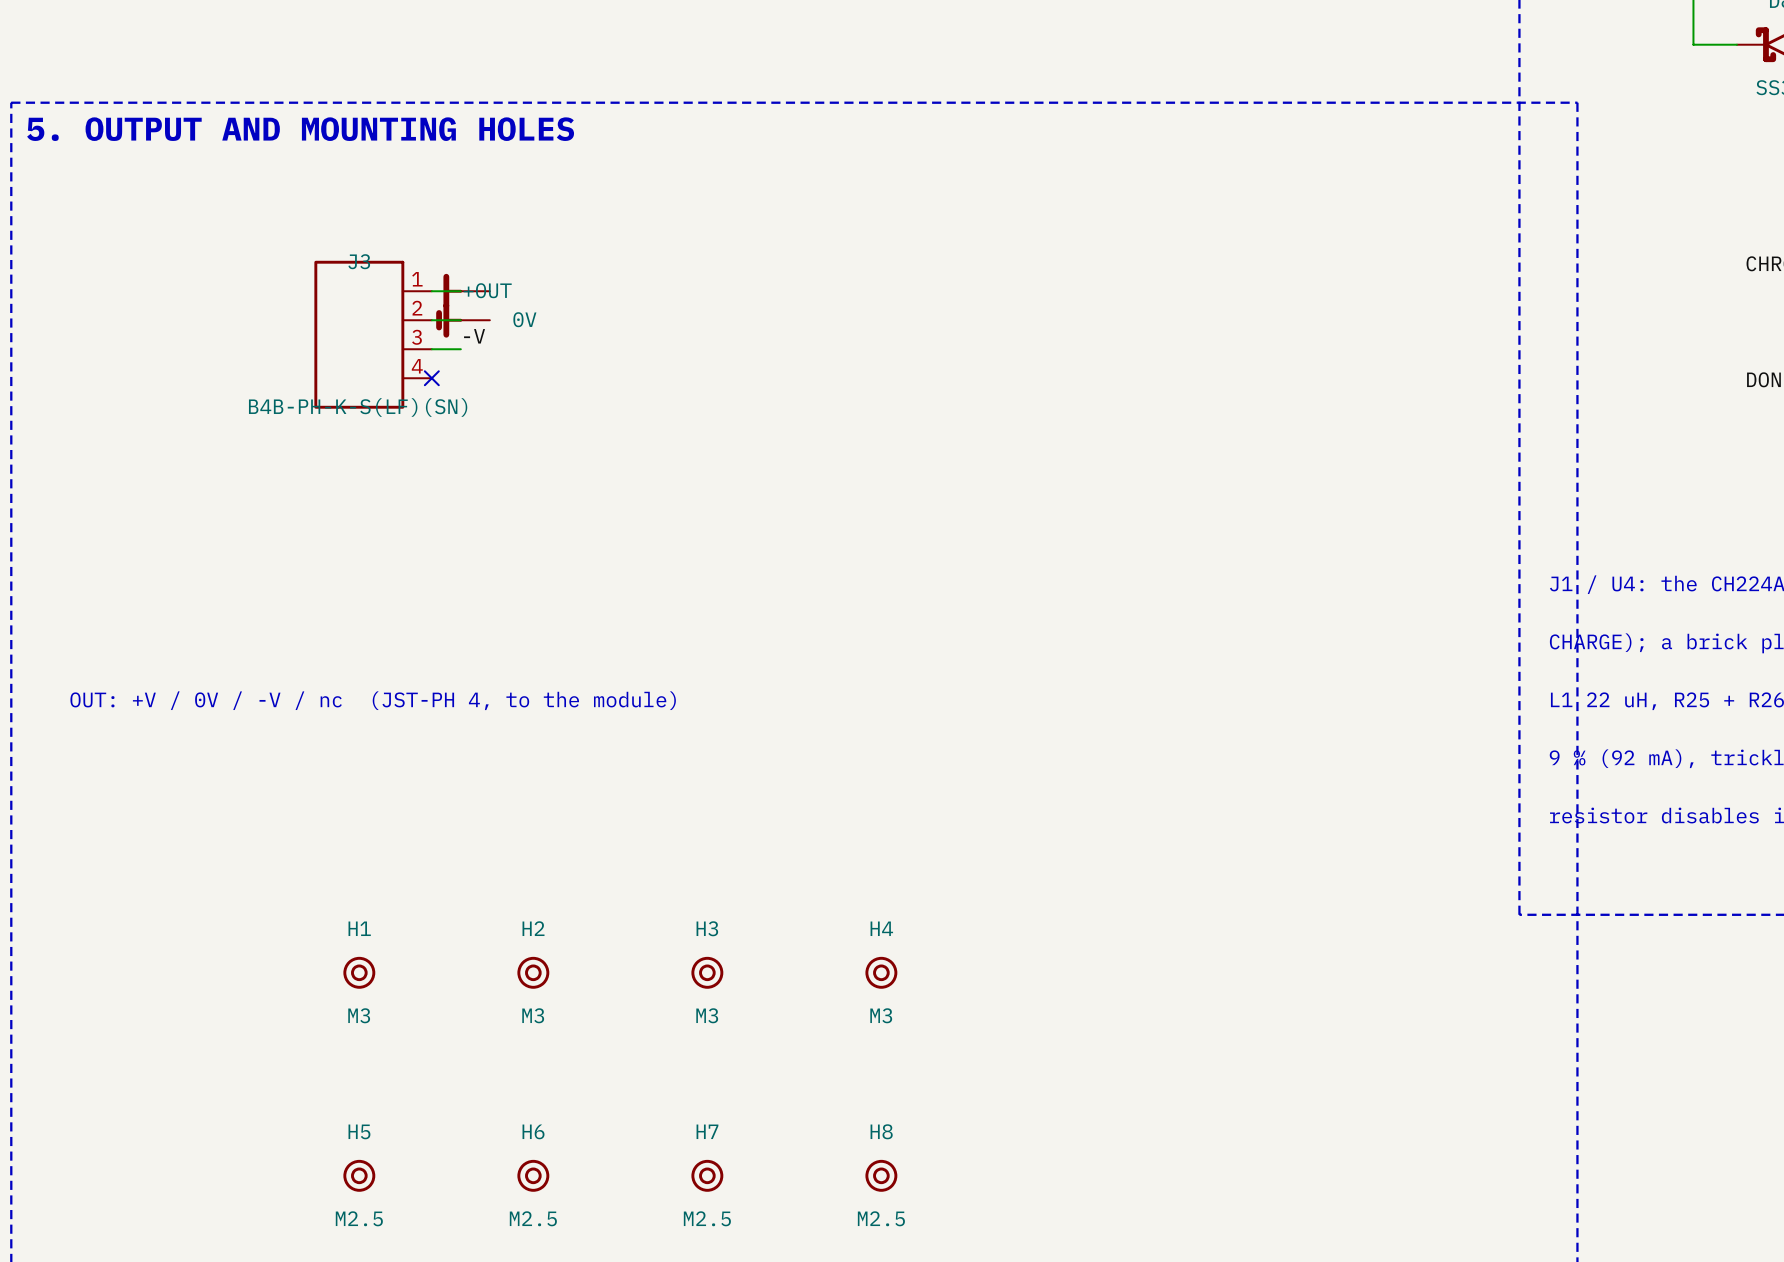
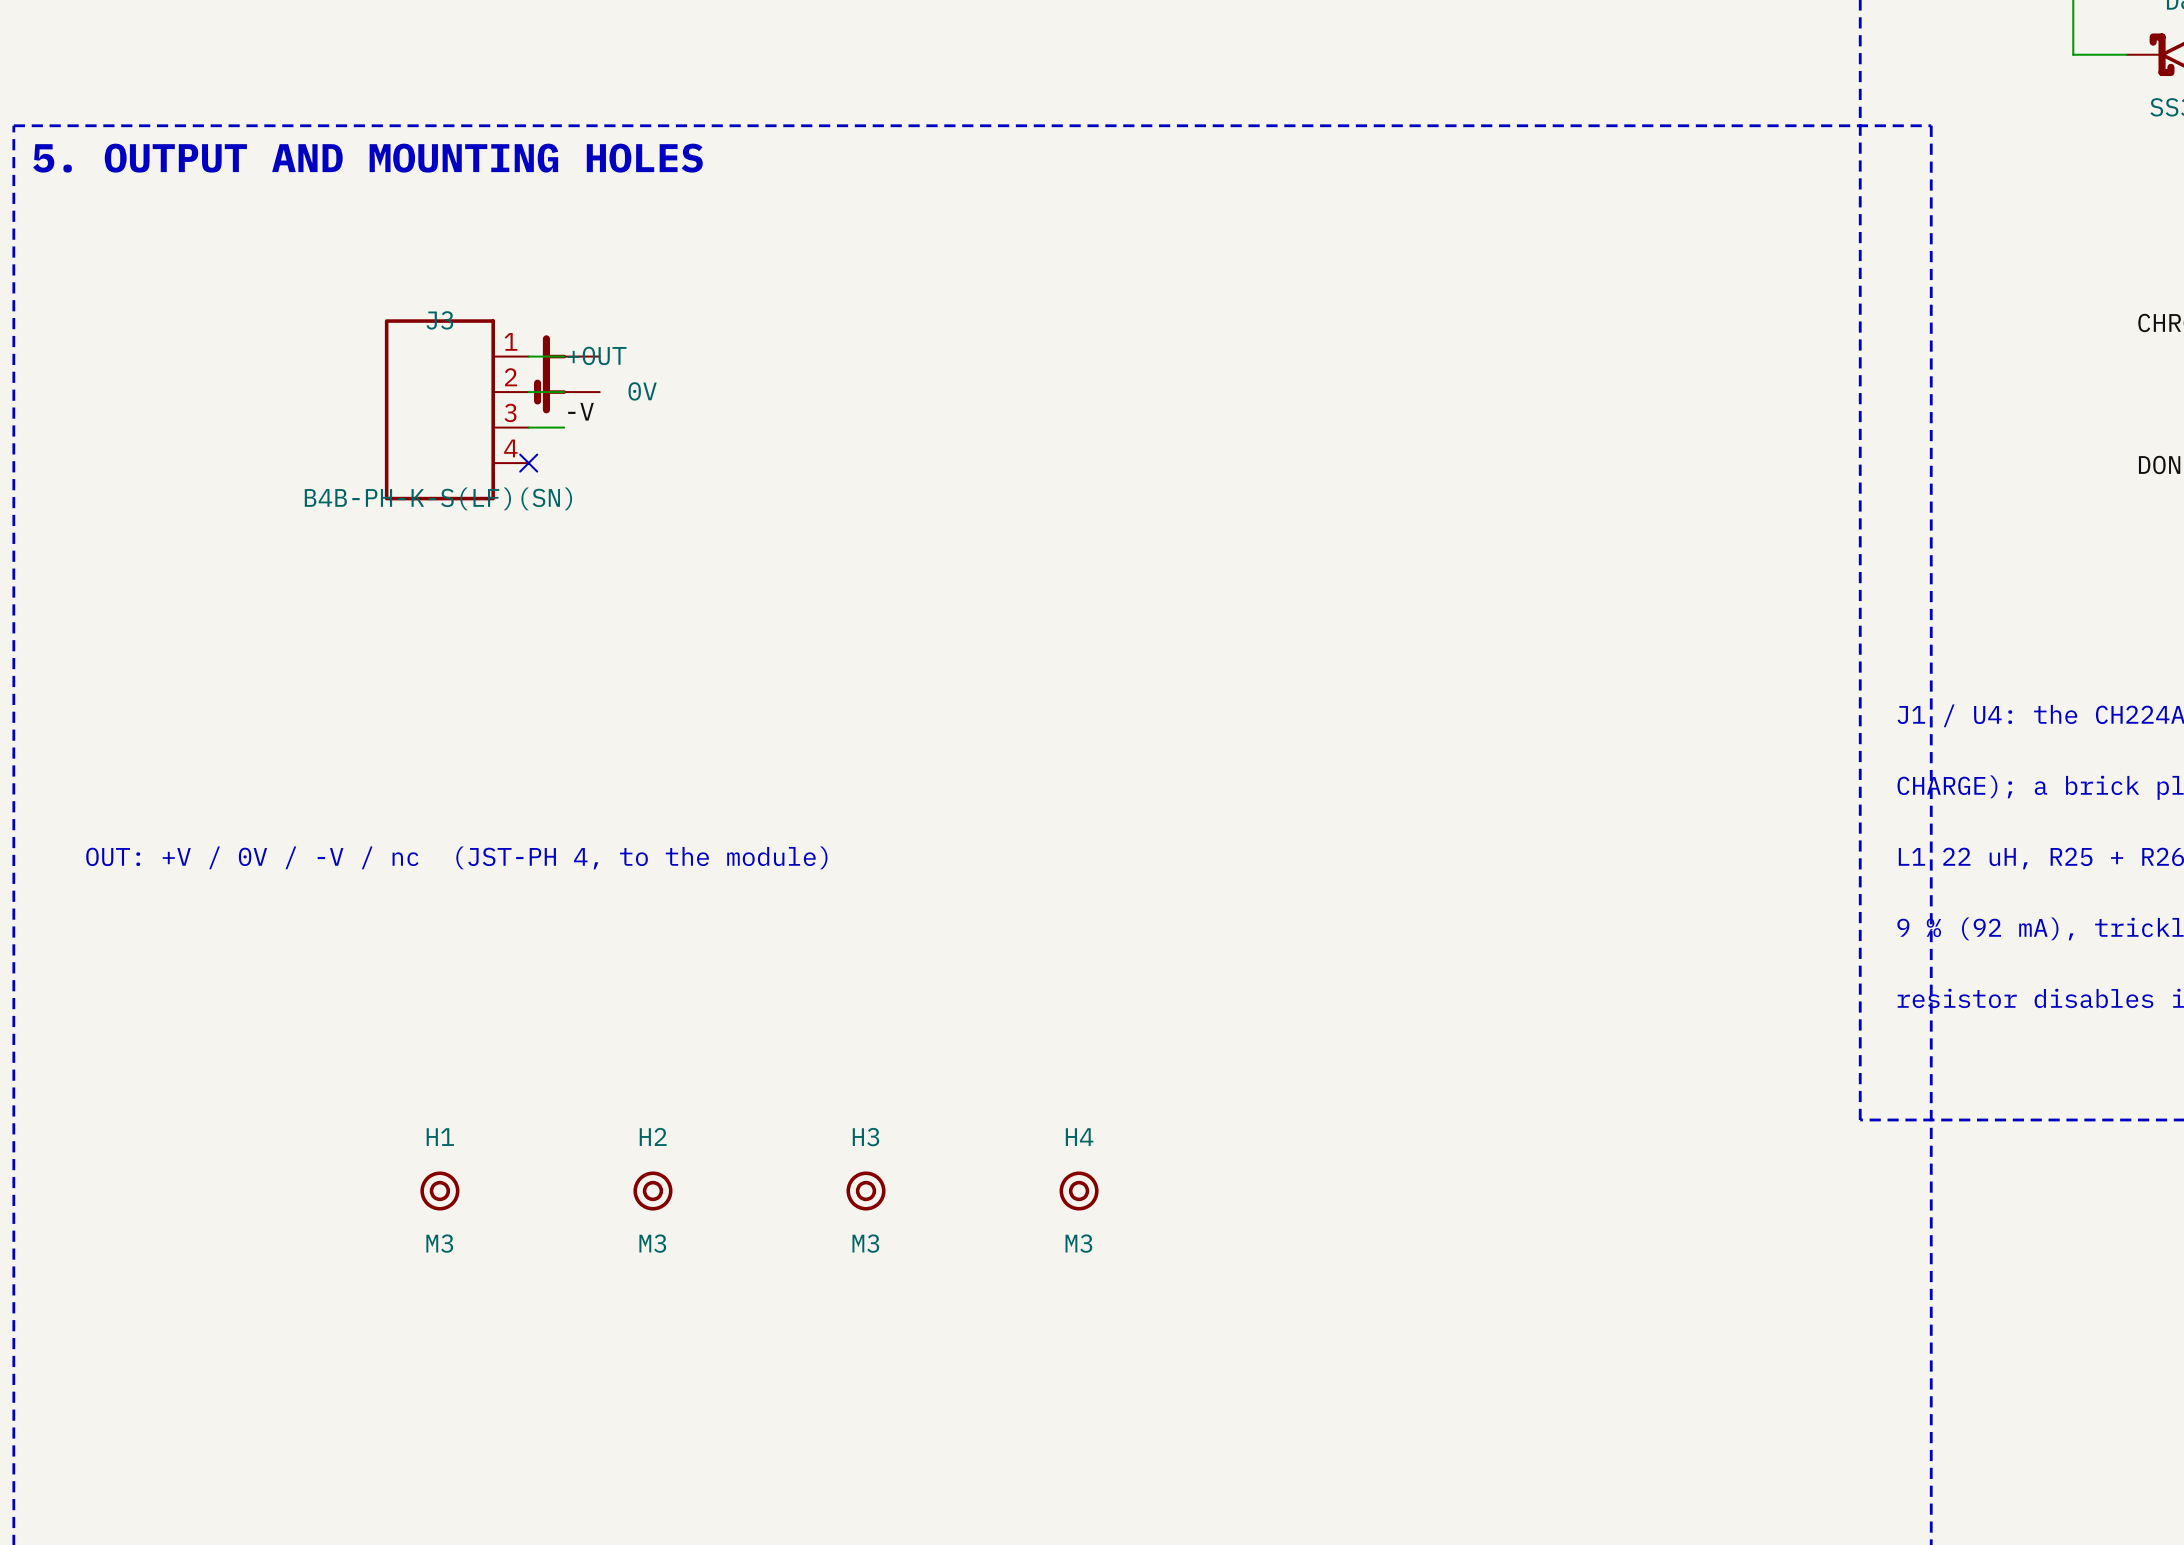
H5: M2.5 (359, 1175) -> none
H6: M2.5 (533, 1175) -> none
H7: M2.5 (707, 1175) -> none
H8: M2.5 (881, 1175) -> none

